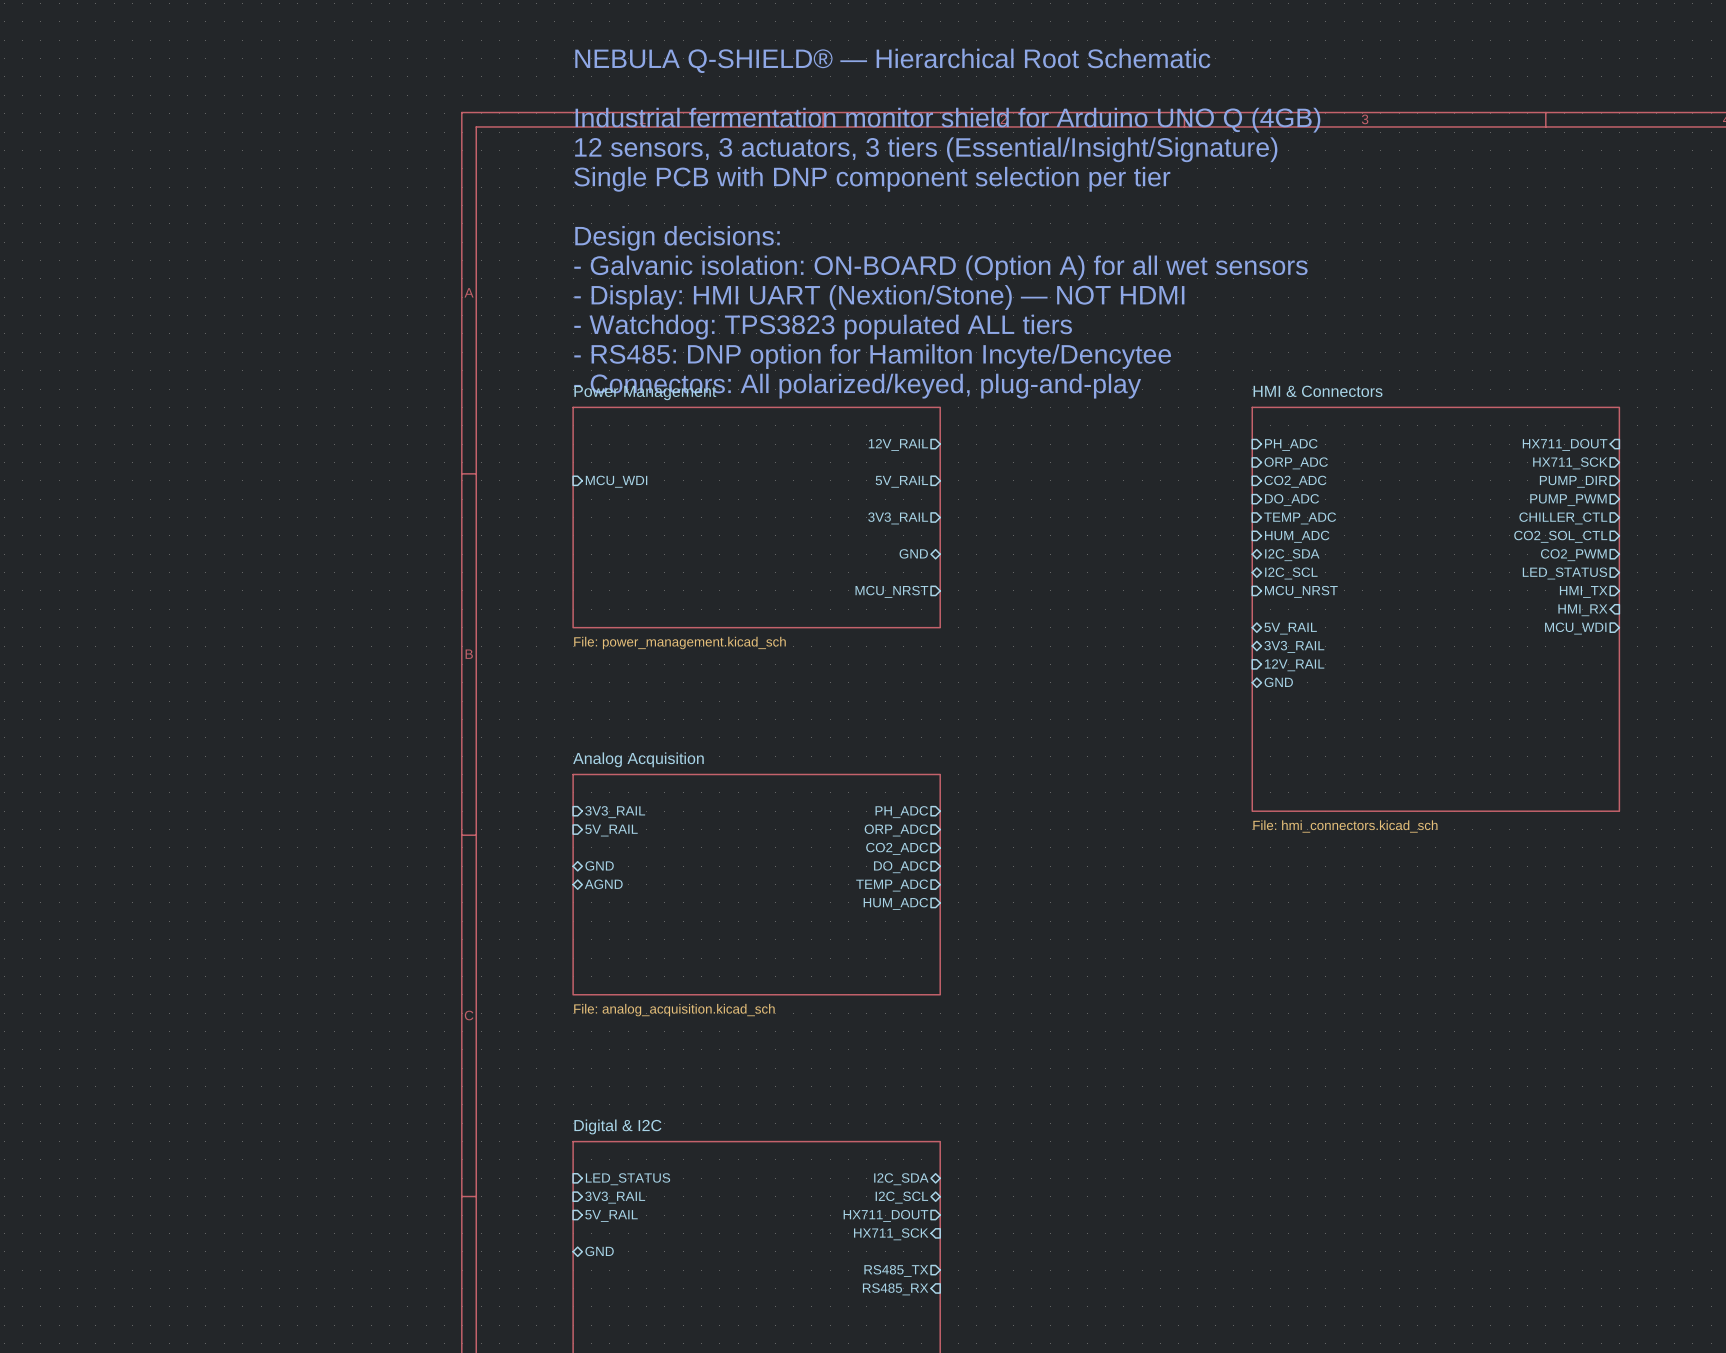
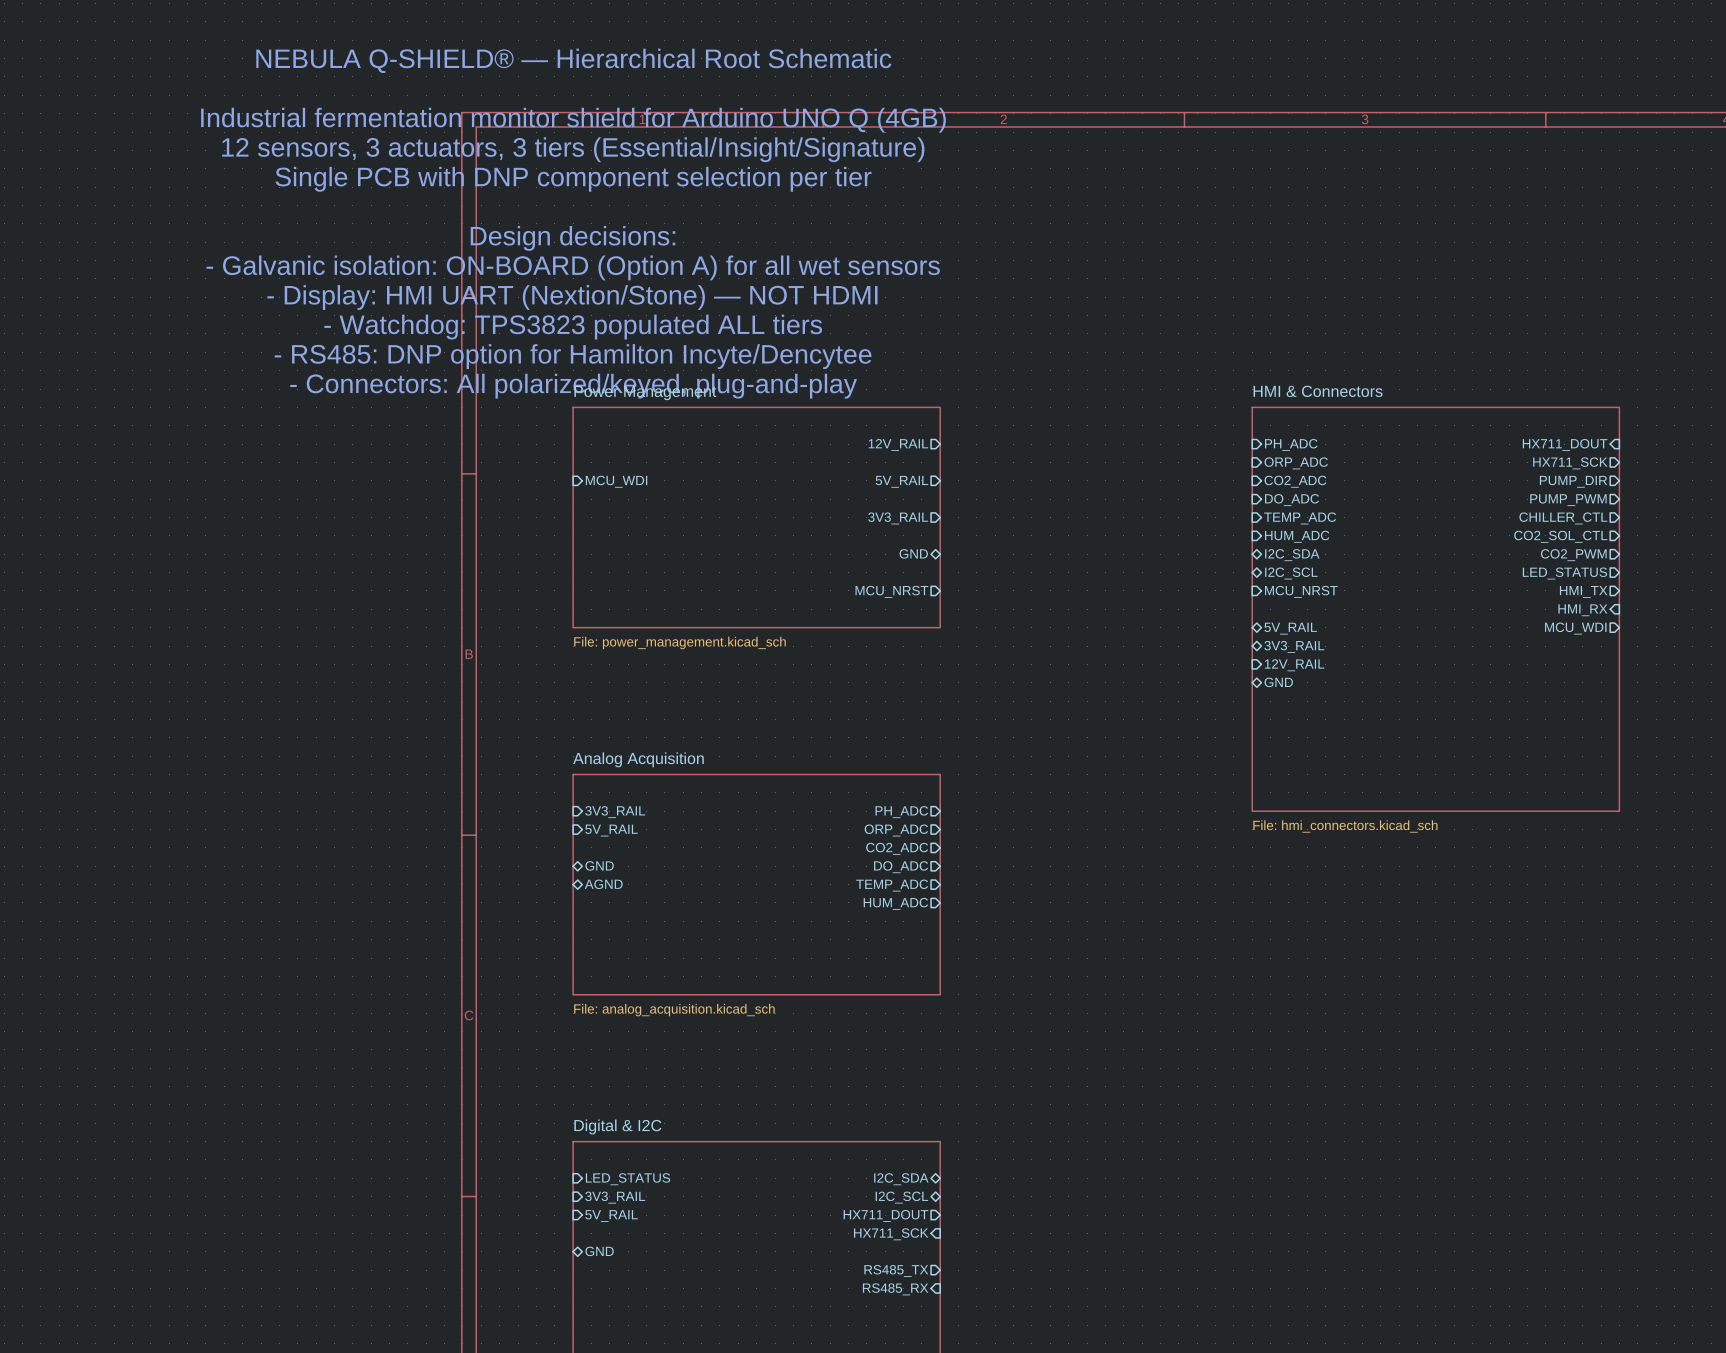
text position: NEBULA Q-SHIELD® — Hierarchical Root Schematic (892, 60) -> NEBULA Q-SHIELD® — Hierarchical Root Schematic (573, 60)
text position: Industrial fermentation monitor shield for Arduino UNO Q (4GB) (947, 120) -> Industrial fermentation monitor shield for Arduino UNO Q (4GB) (573, 120)
text position: 12 sensors, 3 actuators, 3 tiers (Essential/Insight/Signature) (926, 149) -> 12 sensors, 3 actuators, 3 tiers (Essential/Insight/Signature) (573, 149)
text position: Single PCB with DNP component selection per tier (872, 179) -> Single PCB with DNP component selection per tier (573, 179)
text position: Design decisions: (677, 238) -> Design decisions: (572, 238)
text position: - Galvanic isolation: ON-BOARD (Option A) for all wet sensors (940, 267) -> - Galvanic isolation: ON-BOARD (Option A) for all wet sensors (573, 267)
text position: - Display: HMI UART (Nextion/Stone) — NOT HDMI (879, 297) -> - Display: HMI UART (Nextion/Stone) — NOT HDMI (572, 297)
text position: - Watchdog: TPS3823 populated ALL tiers (823, 327) -> - Watchdog: TPS3823 populated ALL tiers (573, 327)
text position: - RS485: DNP option for Hamilton Incyte/Dencytee (872, 356) -> - RS485: DNP option for Hamilton Incyte/Dencytee (573, 356)
text position: - Connectors: All polarized/keyed, plug-and-play (857, 386) -> - Connectors: All polarized/keyed, plug-and-play (573, 386)

